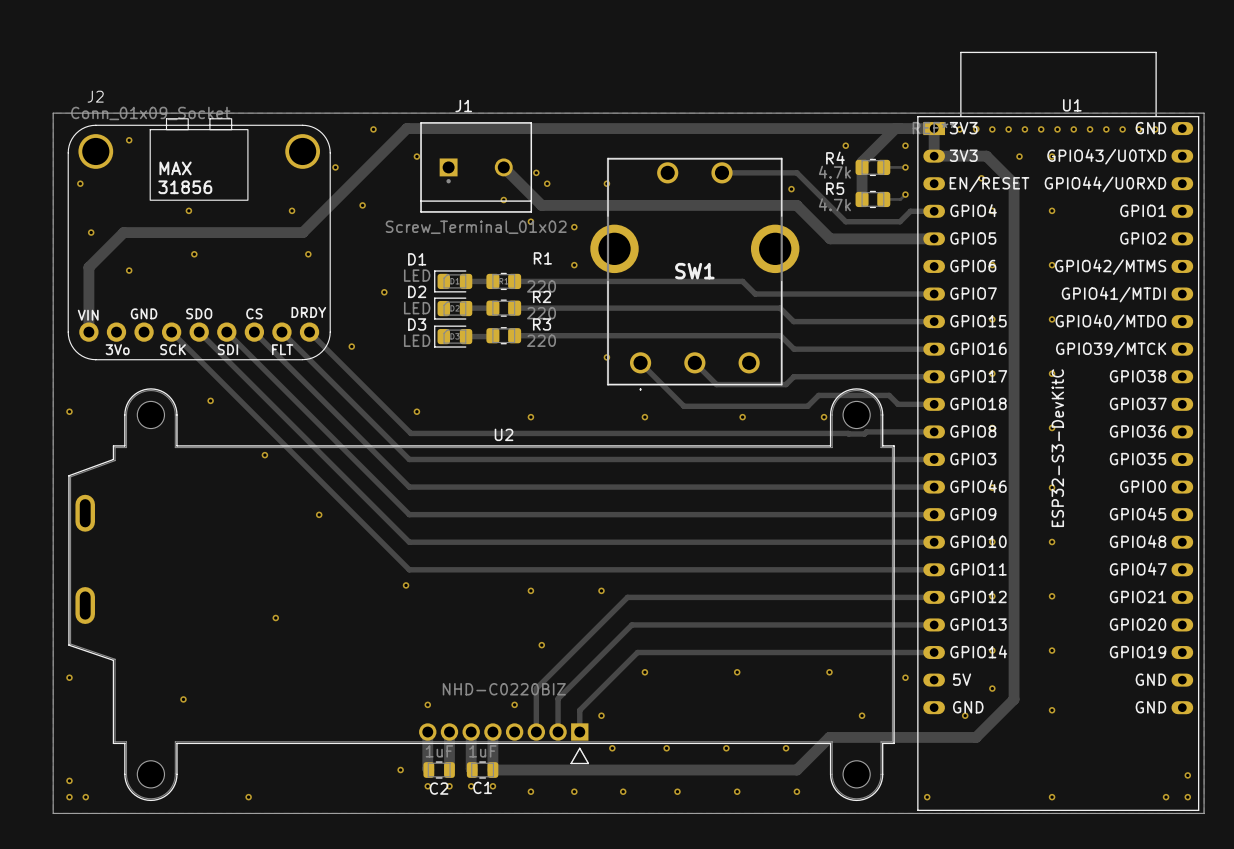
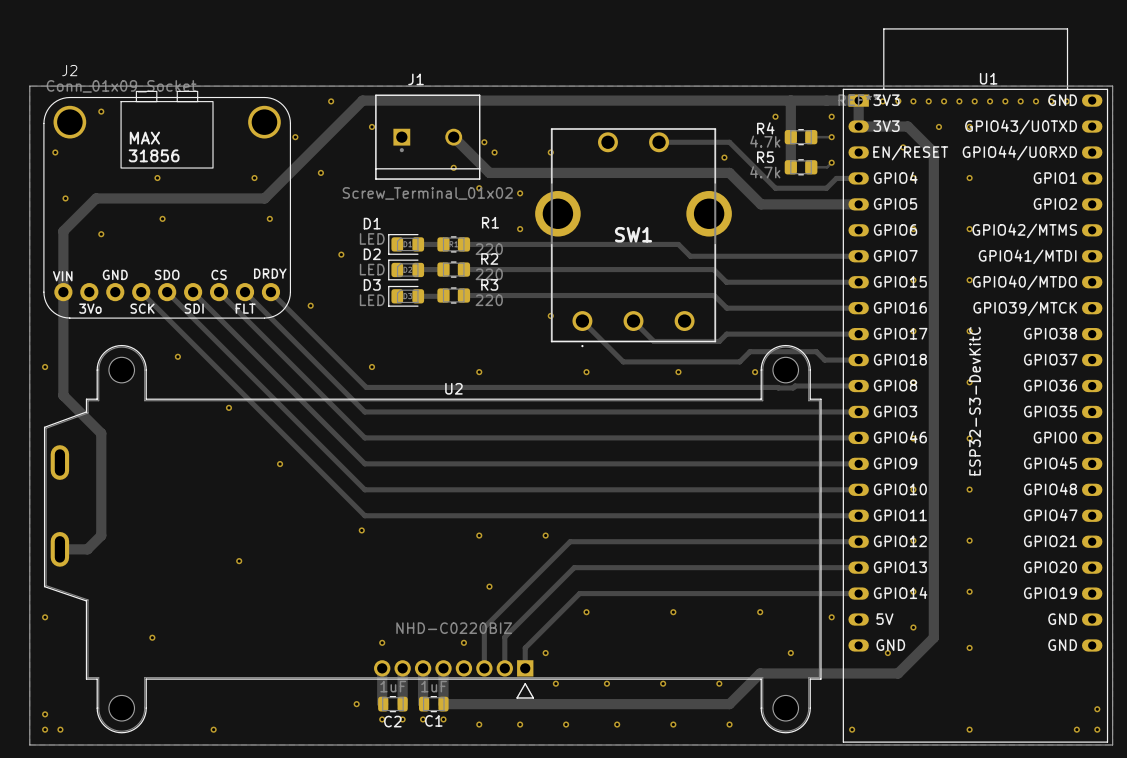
track: (895, 128) (862, 162) -> (790, 100) (790, 132)
track: none -> (63, 292) (63, 395) (101, 433) (101, 535) (87, 549) (59, 549)

